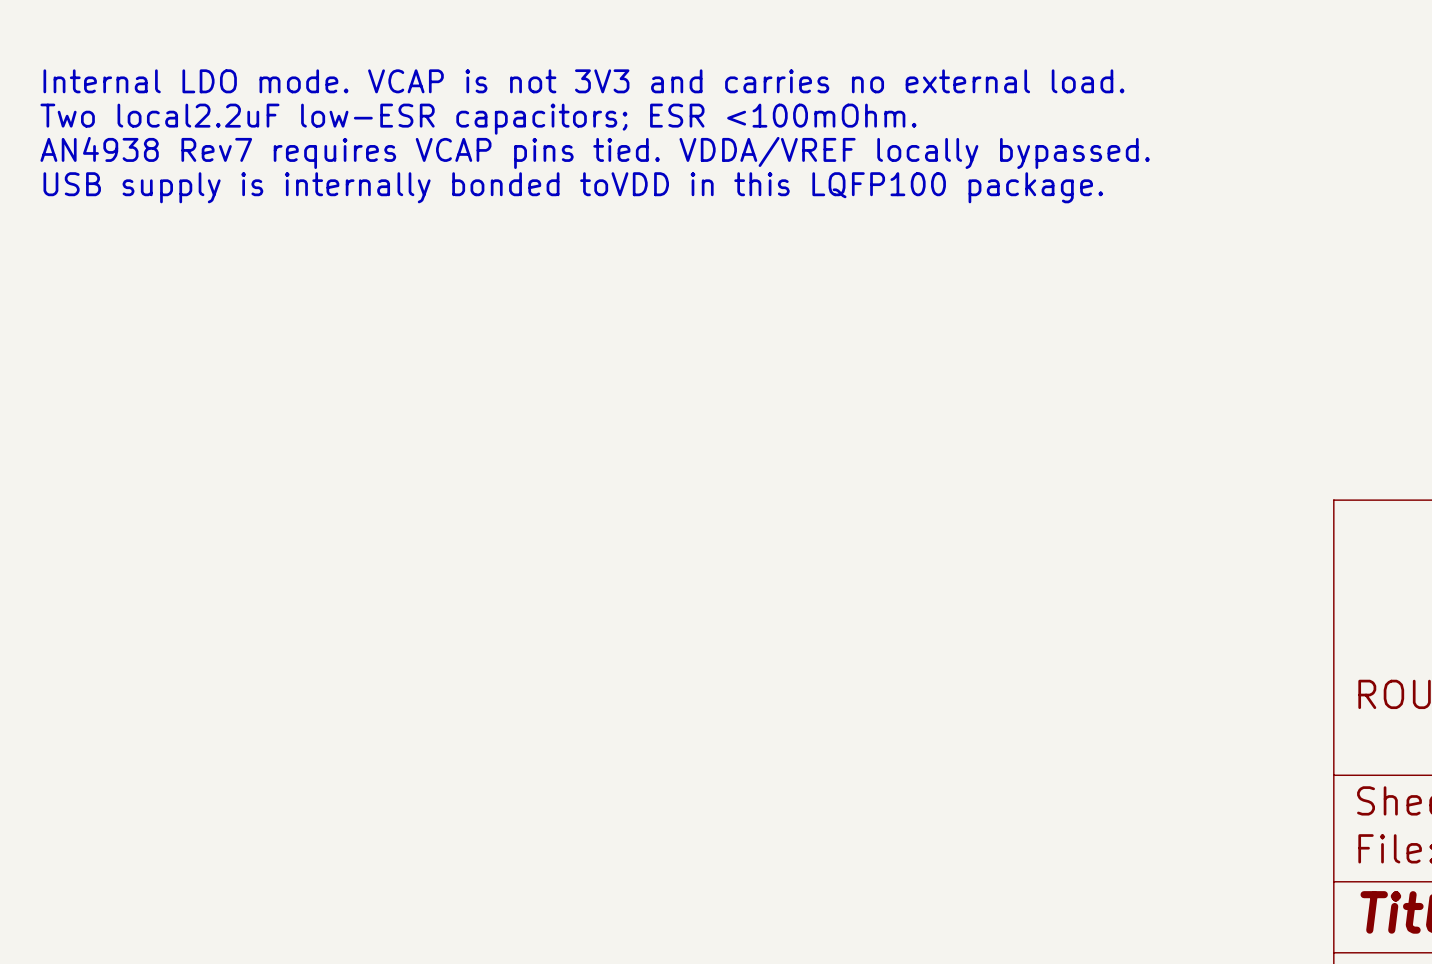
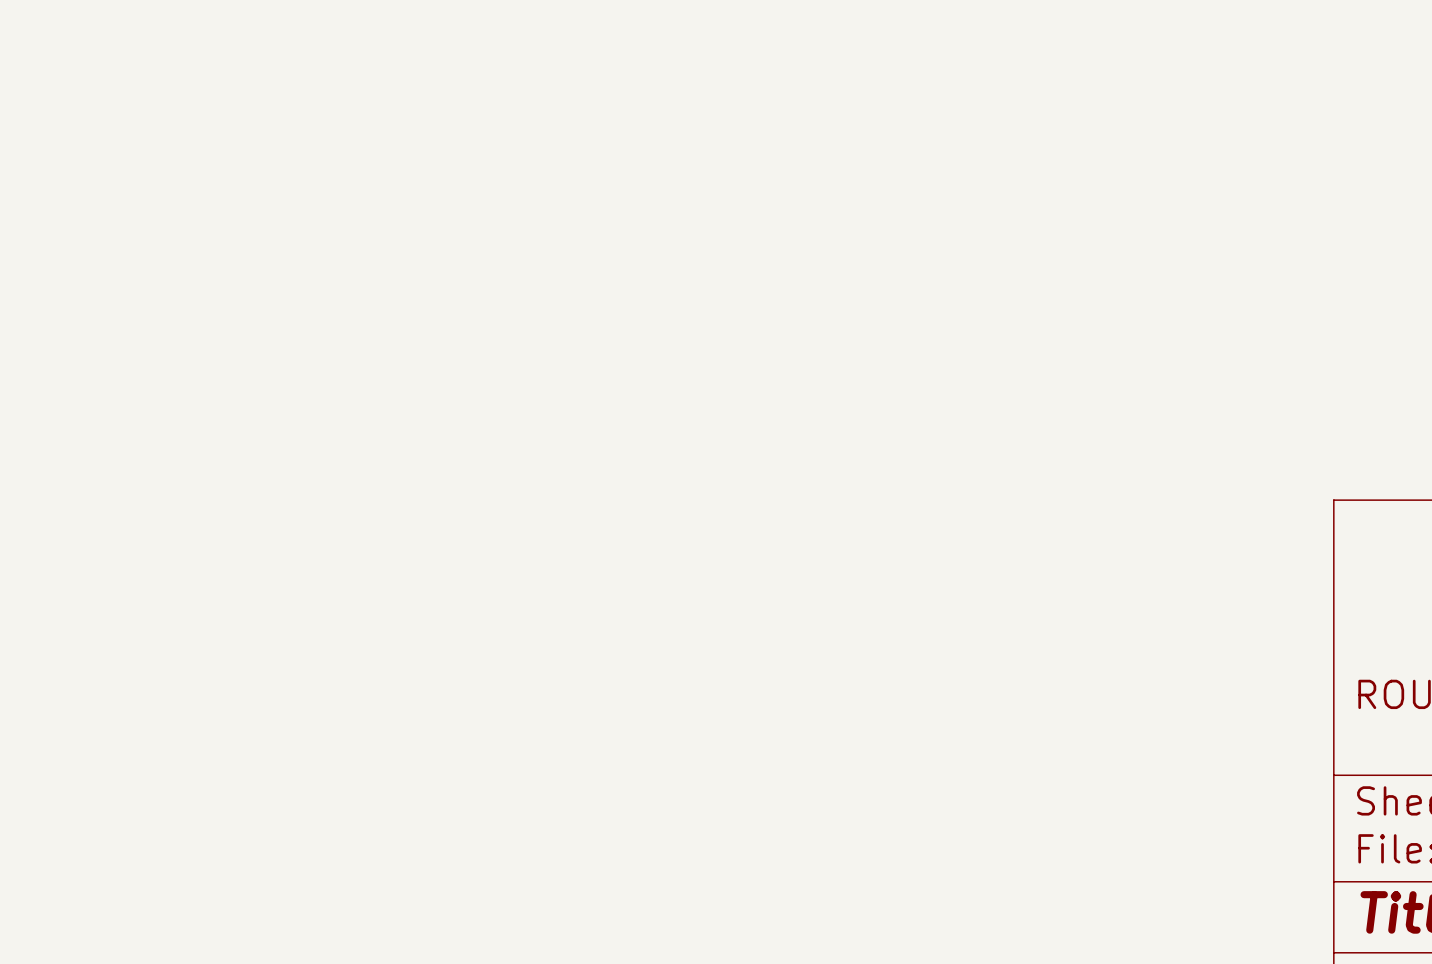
text: Internal LDO mode. VCAP is not 3V3 and carries no external load. (583, 81) -> none
text: Two local2.2uF low-ESR capacitors; ESR <100mOhm. (478, 119) -> none
text: AN4938 Rev7 requires VCAP pins tied. VDDA/VREF locally bypassed. (595, 152) -> none
text: USB supply is internally bonded toVDD in this LQFP100 package. (573, 187) -> none

